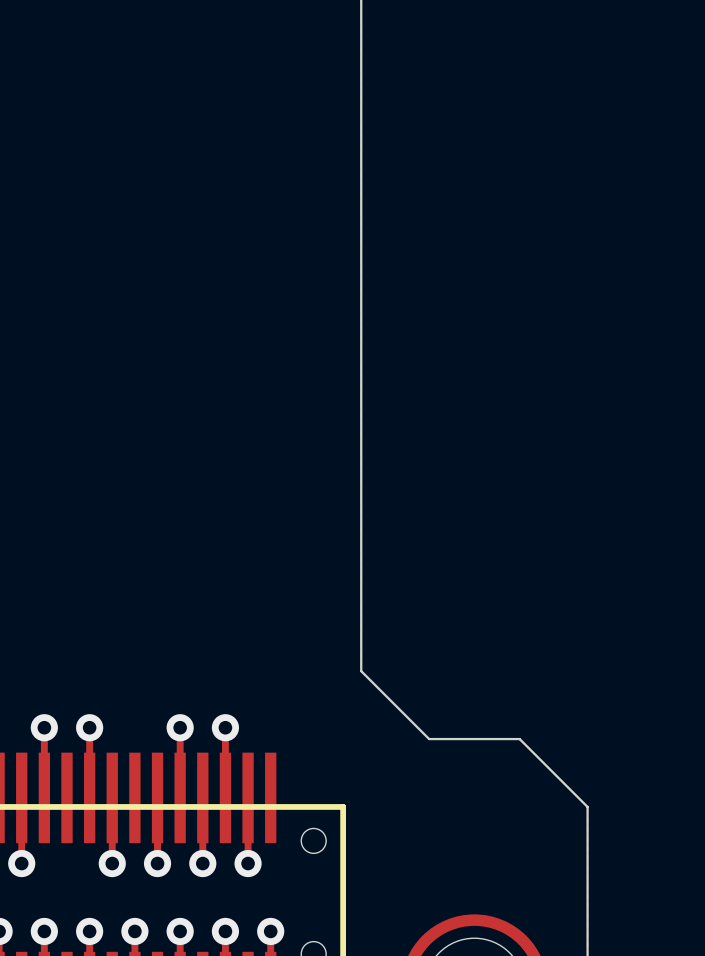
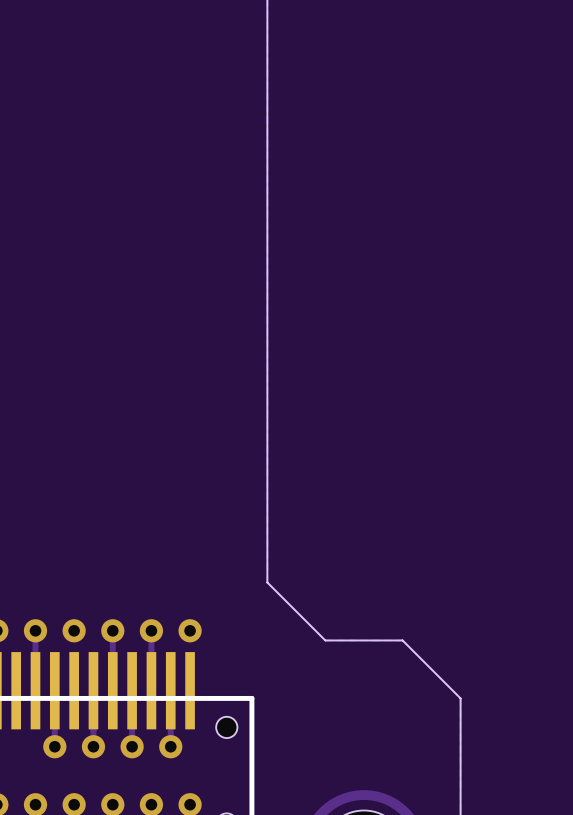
via: none -> (74, 630)
via: none -> (190, 630)

